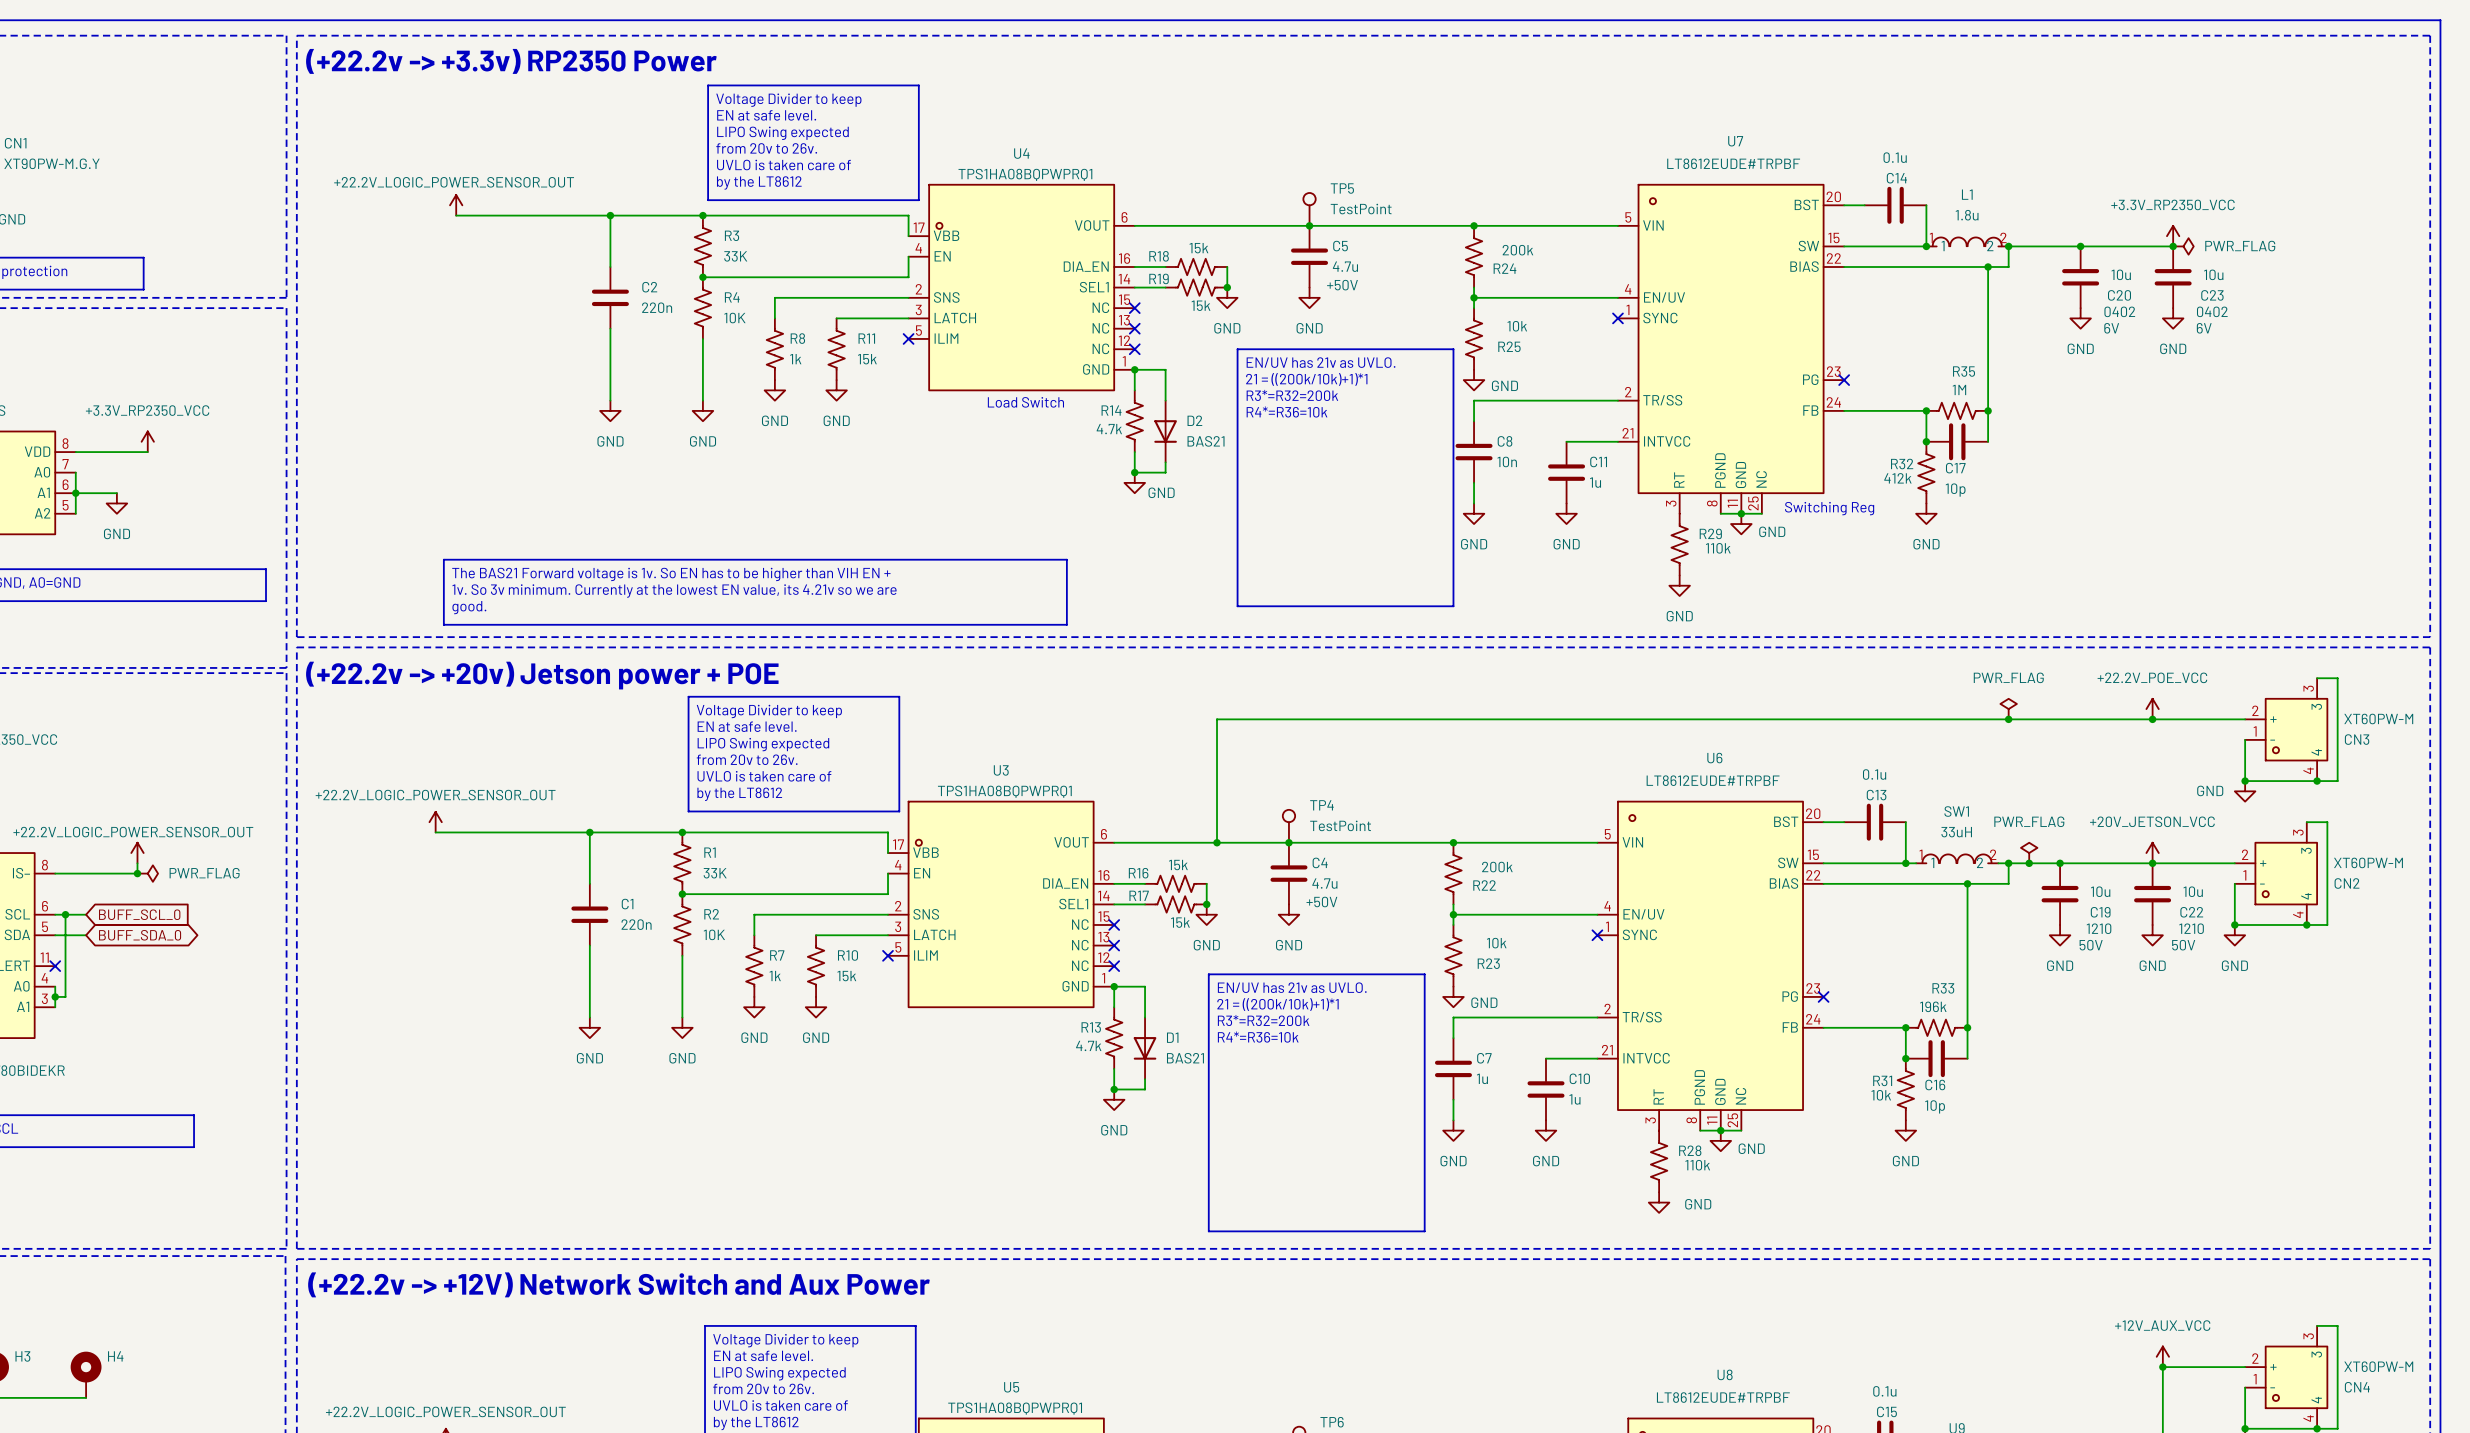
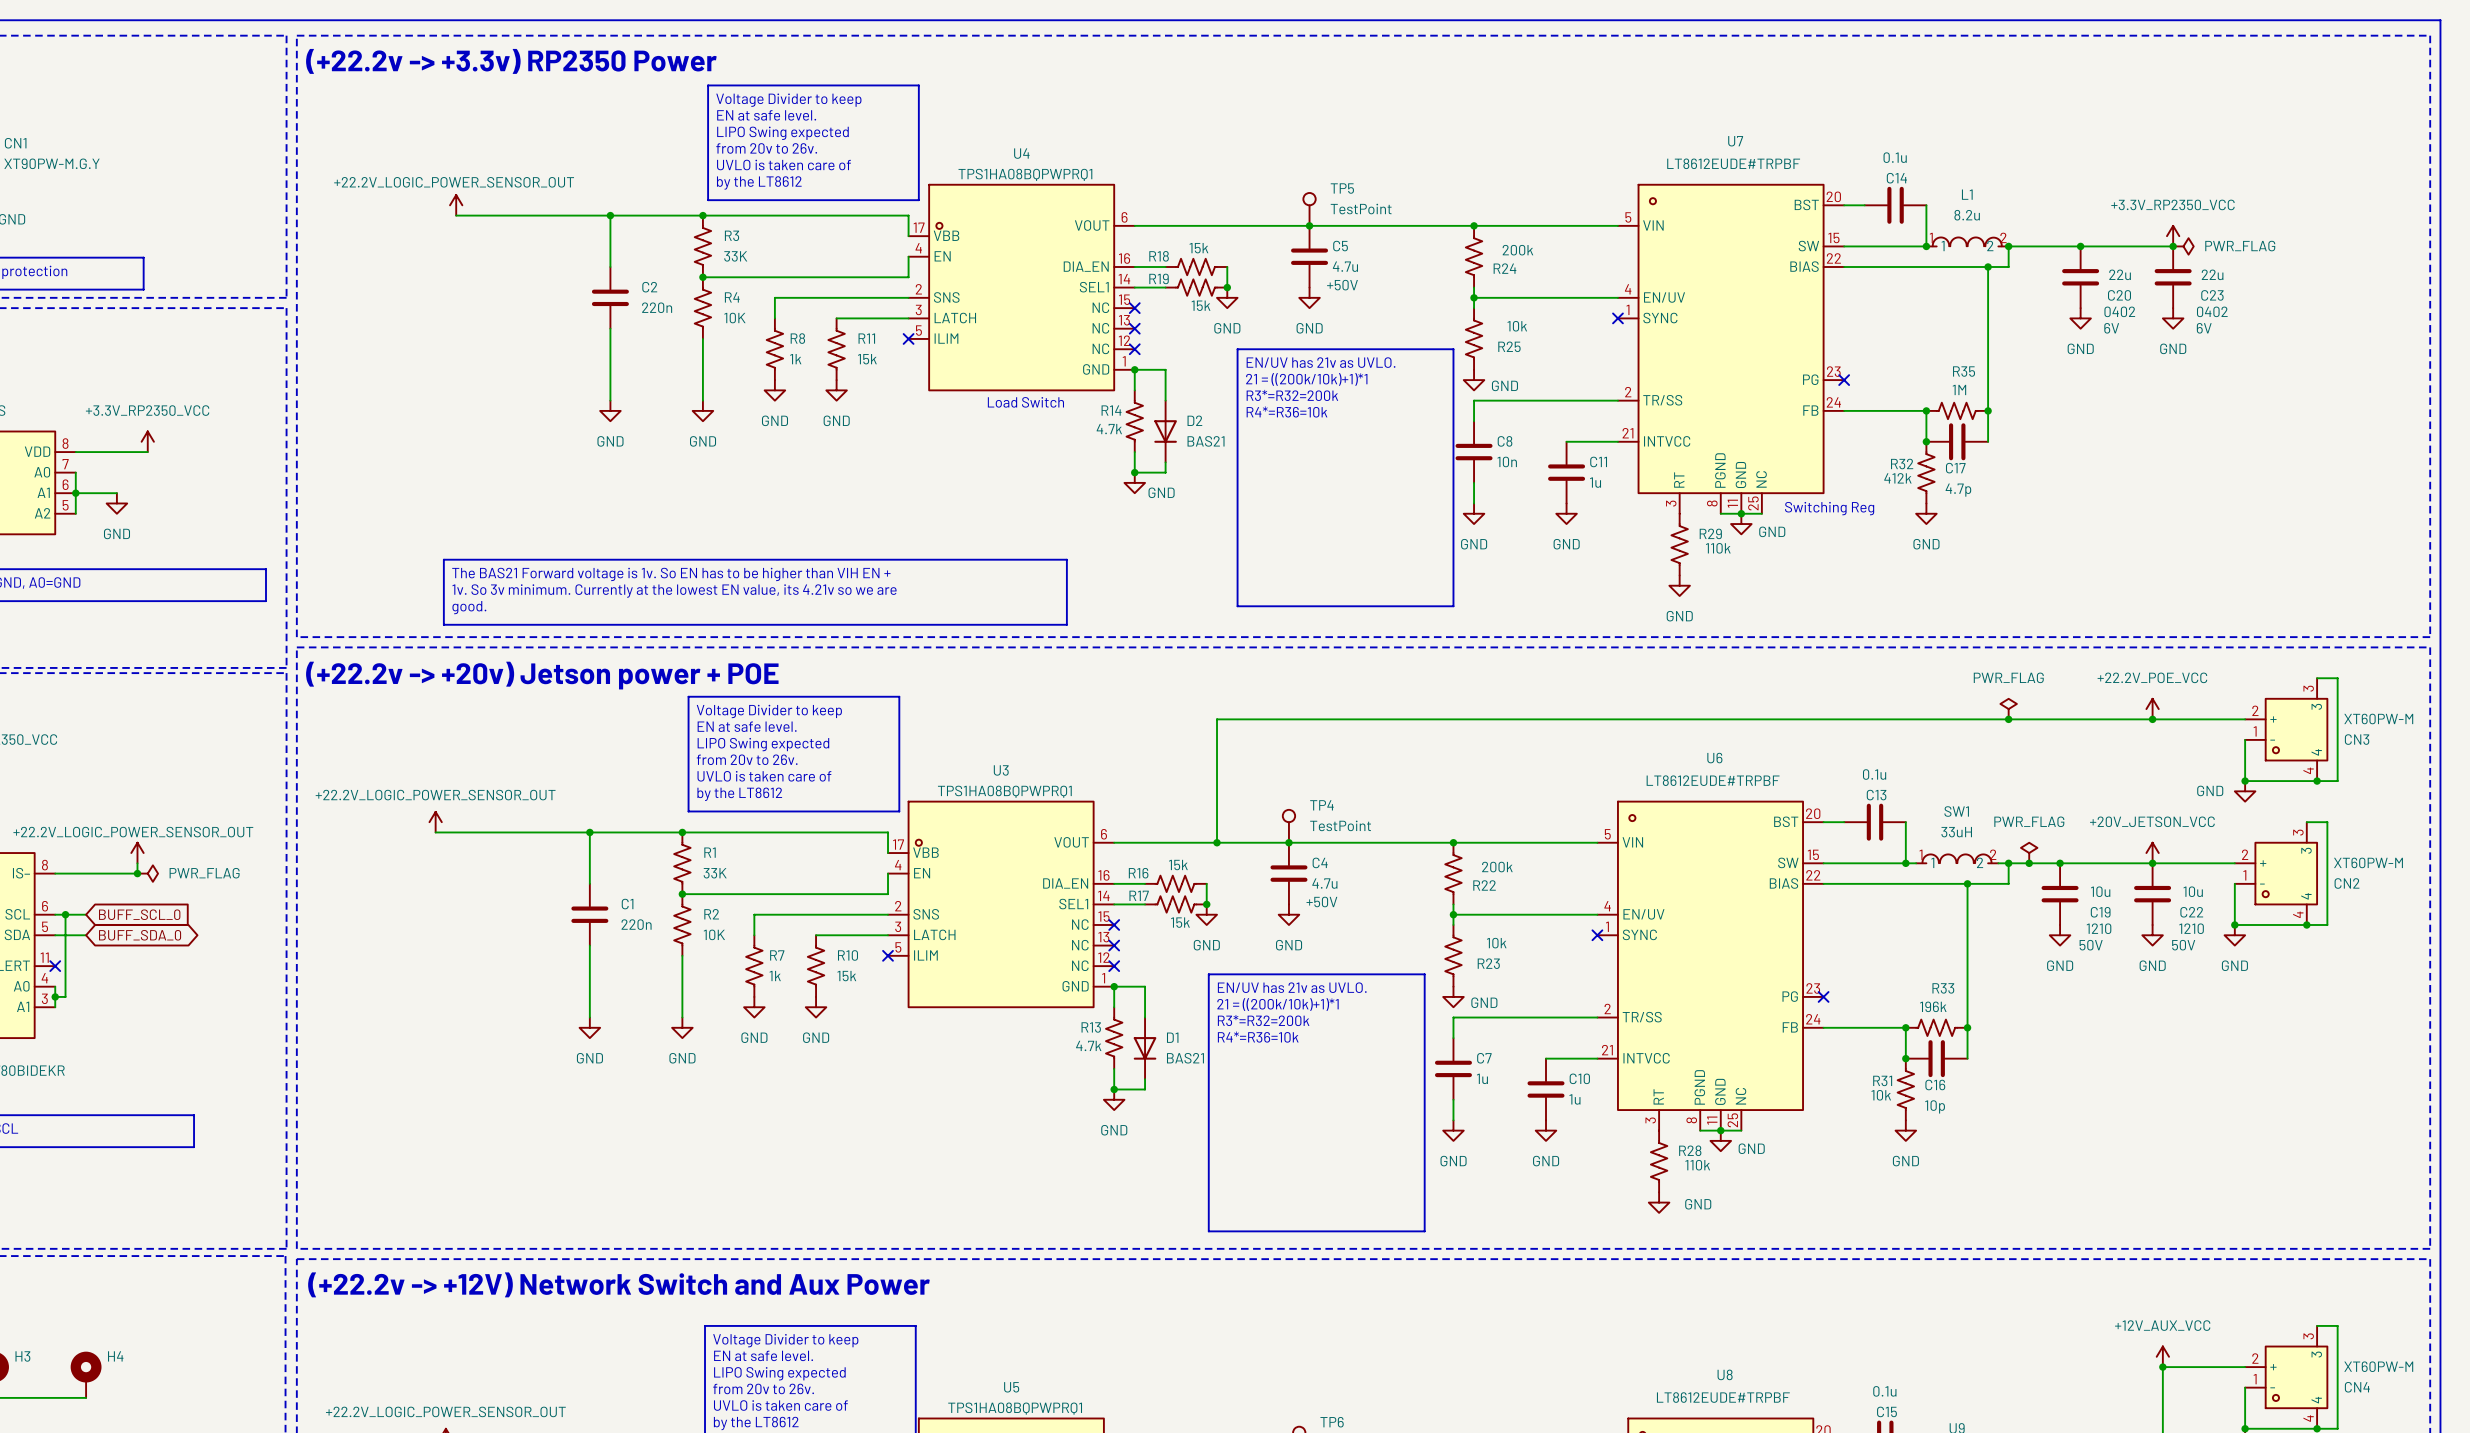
L1 value: 1.8u (1967, 215) -> 8.2u (1967, 215)
C20 value: 10u (2121, 274) -> 22u (2120, 274)
C23 value: 10u (2213, 274) -> 22u (2212, 274)
C17 value: 10p (1955, 490) -> 4.7p (1958, 490)

